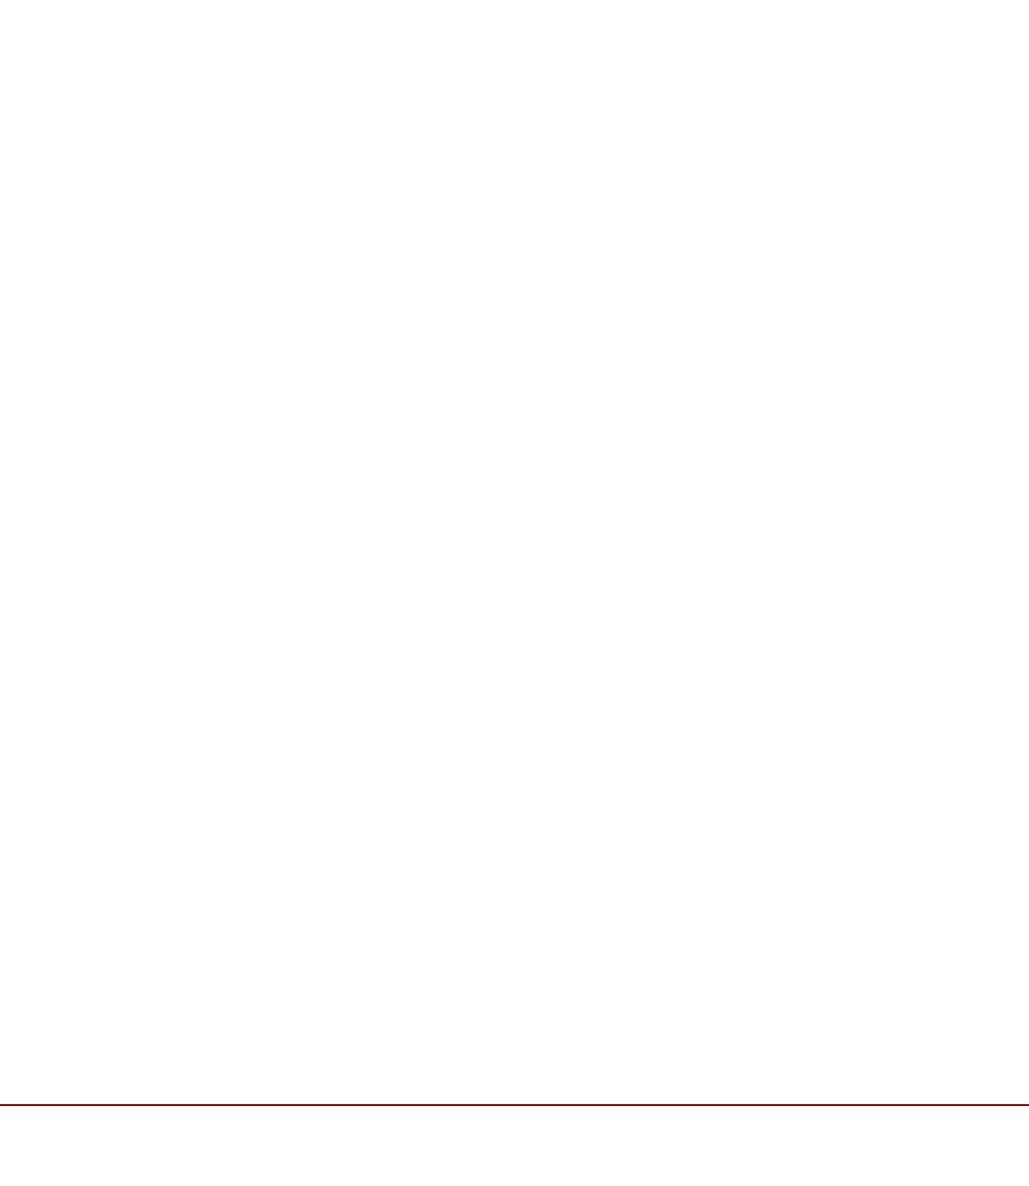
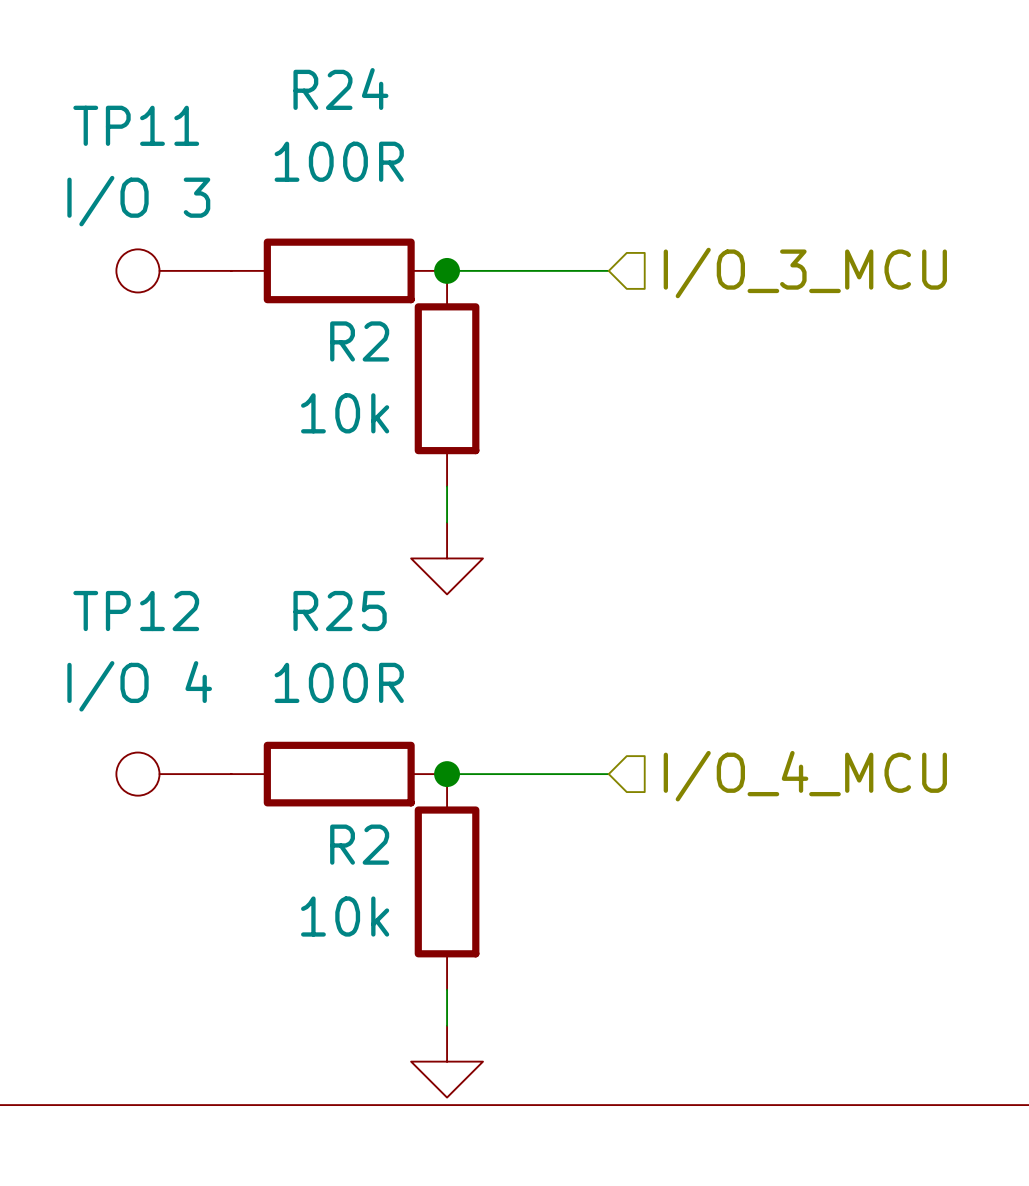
TP11: none -> I/O 3 (173, 270)
R24: none -> 100R (339, 270)
wire: none -> (447, 270) (608, 270)
junction: none -> (447, 270)
hierarchical label: none -> I/O_3_MCU (805, 272)
R2: none -> 10k (447, 378)
wire: none -> (447, 486) (447, 522)
power symbol: none -> (447, 558)
TP12: none -> I/O 4 (173, 774)
R25: none -> 100R (339, 774)
wire: none -> (447, 774) (608, 774)
junction: none -> (447, 774)
hierarchical label: none -> I/O_4_MCU (805, 776)
R2: none -> 10k (447, 881)
wire: none -> (447, 989) (447, 1025)
power symbol: none -> (447, 1061)

